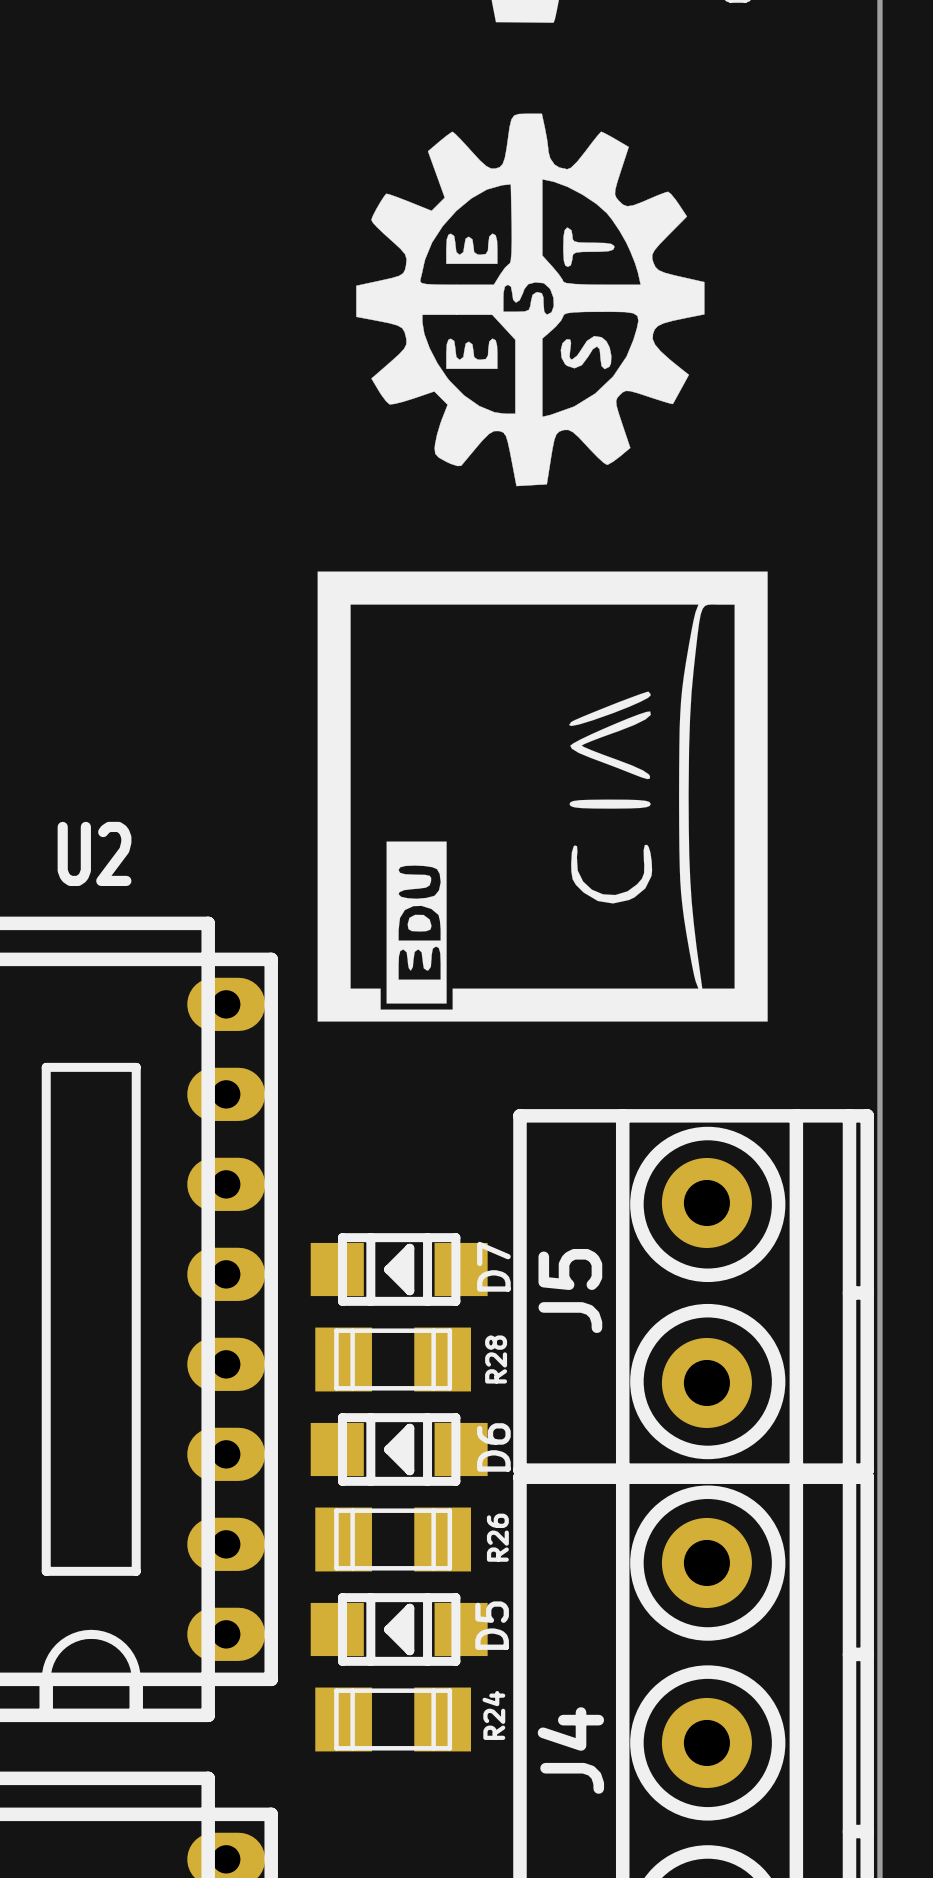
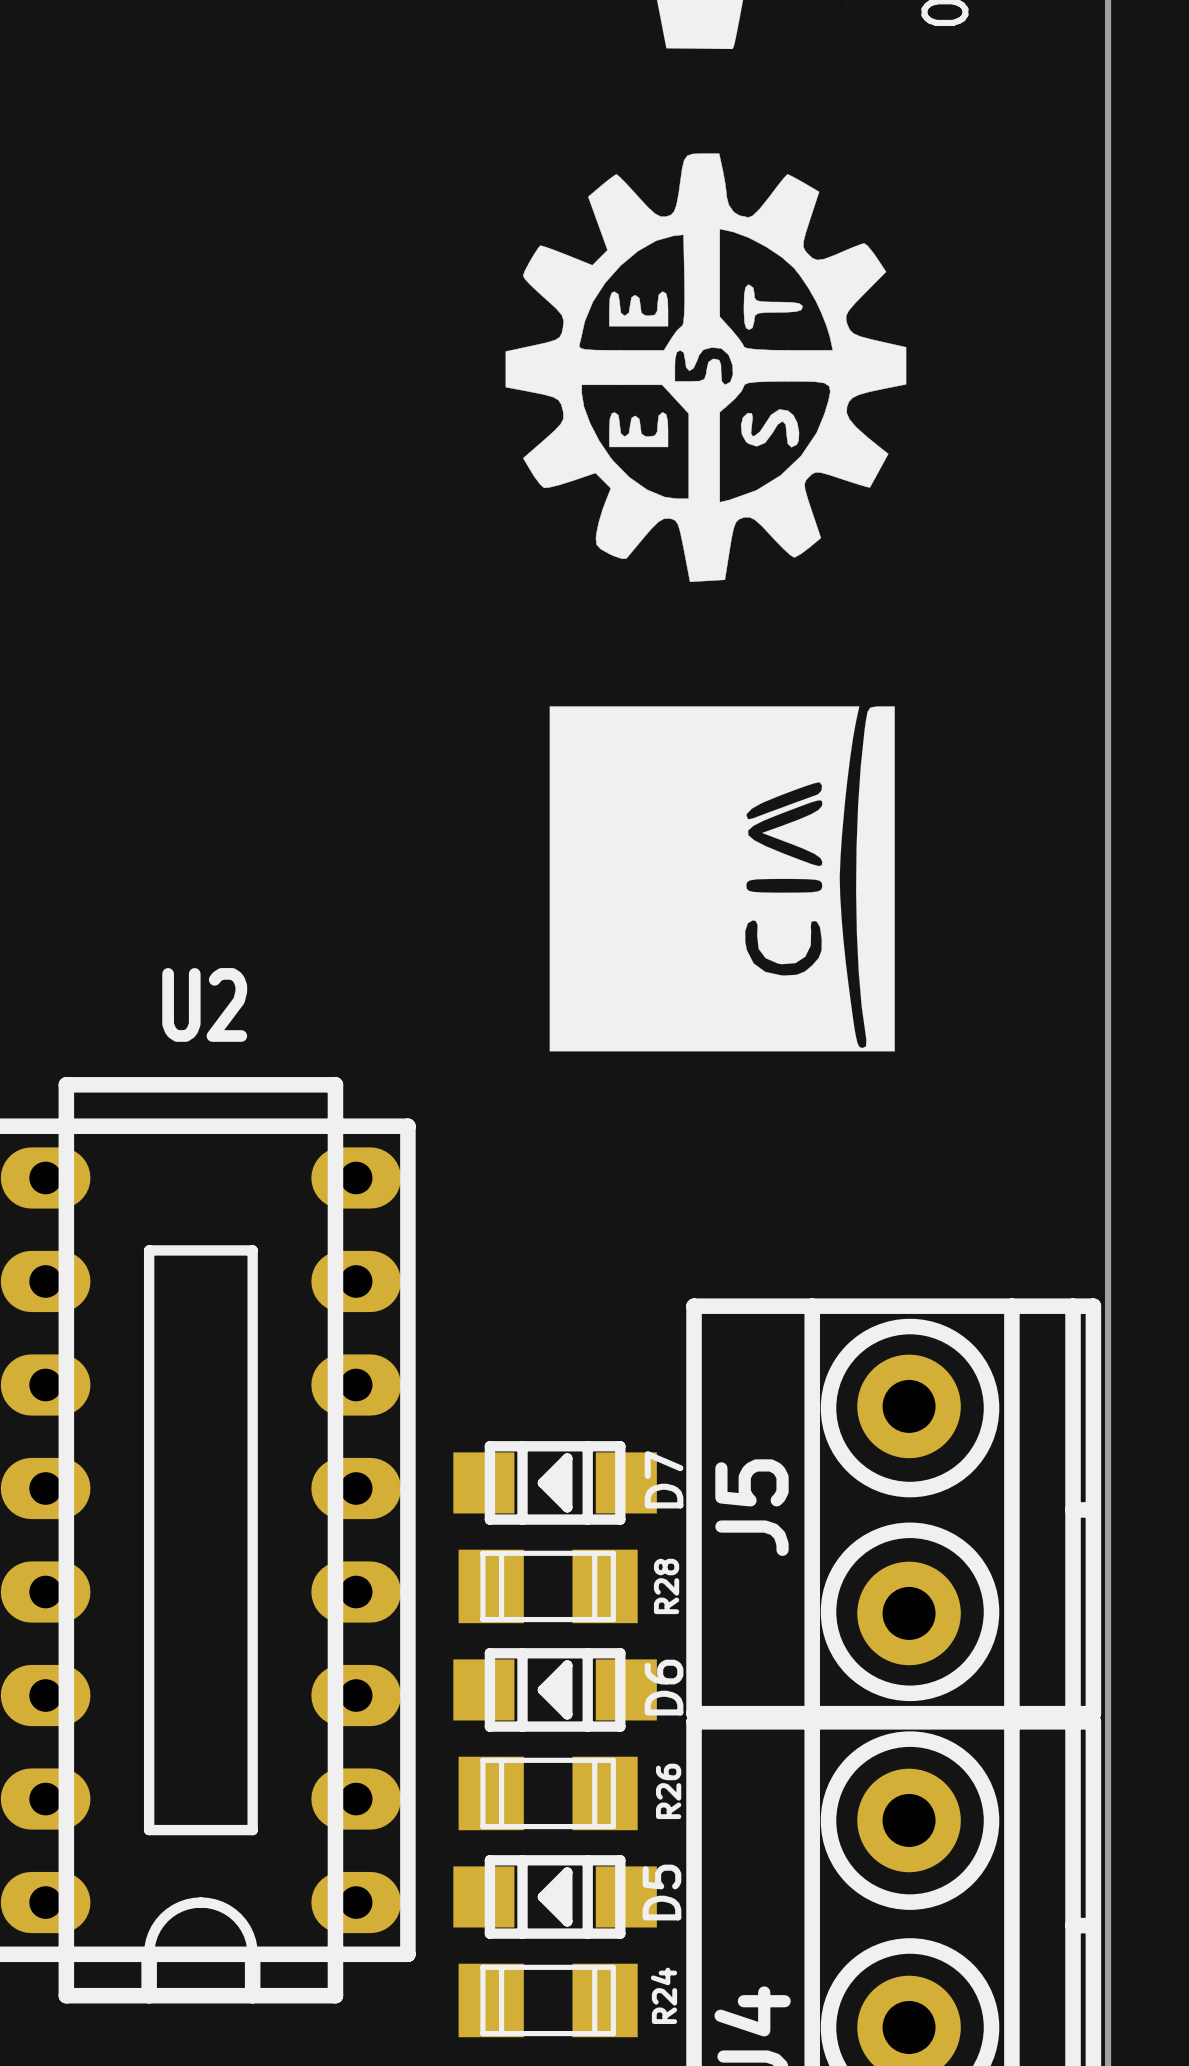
drawing: [317, 571, 768, 1022] -> none
drawing: none -> [549, 706, 895, 1052]

